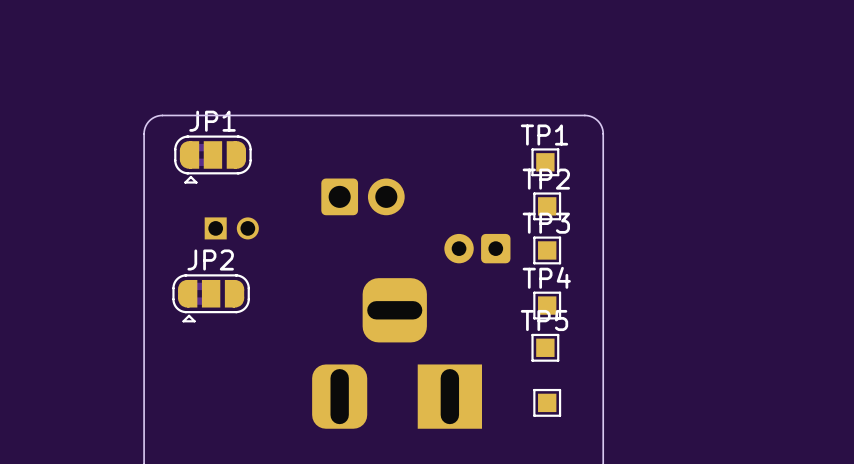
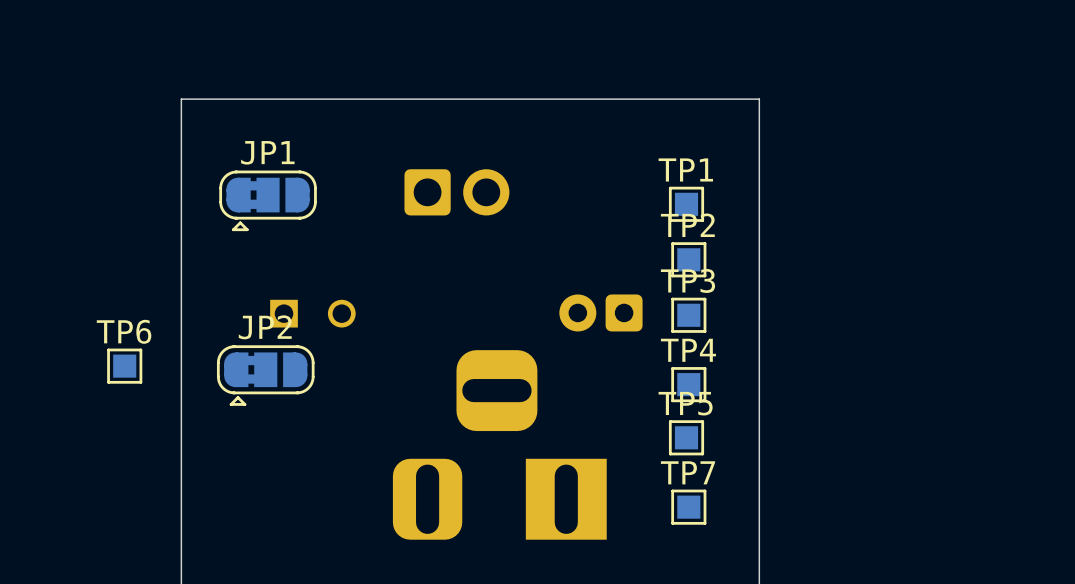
board edge: (603, 133) (597, 120) (584, 115) (162, 115) (149, 120) (144, 133) -> (759, 168) (759, 99) (181, 99) (181, 168)
part position: (362, 196) -> (456, 192)
part: (231, 228) -> none
part: none -> (312, 313)
TP6: none -> (124, 366)
TP7 name: none -> TP7 (687, 472)

